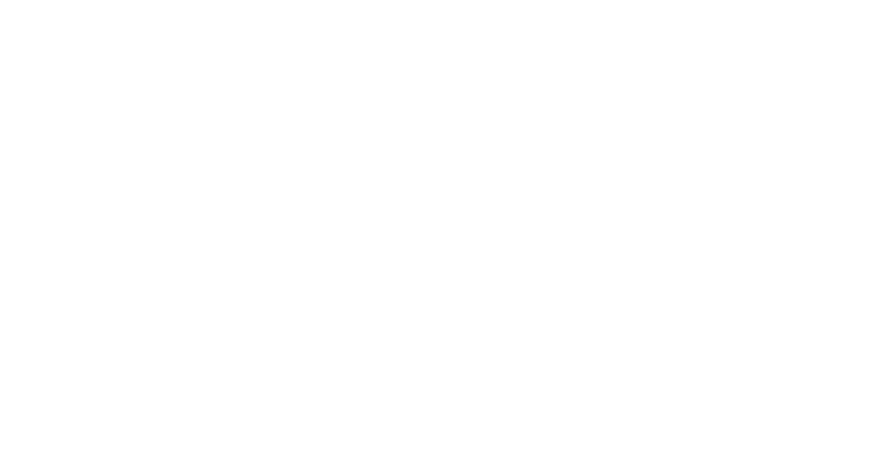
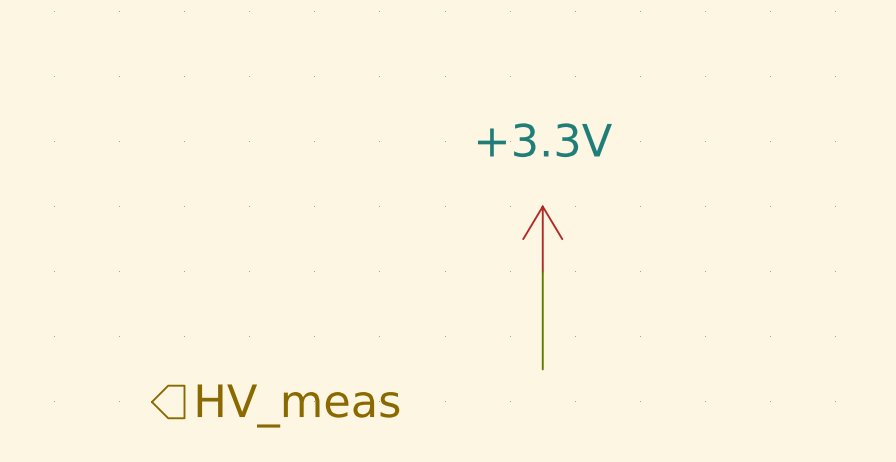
power symbol: none -> +3.3V (542, 239)
wire: none -> (542, 271) (542, 369)
hierarchical label: none -> HV_meas (298, 406)

